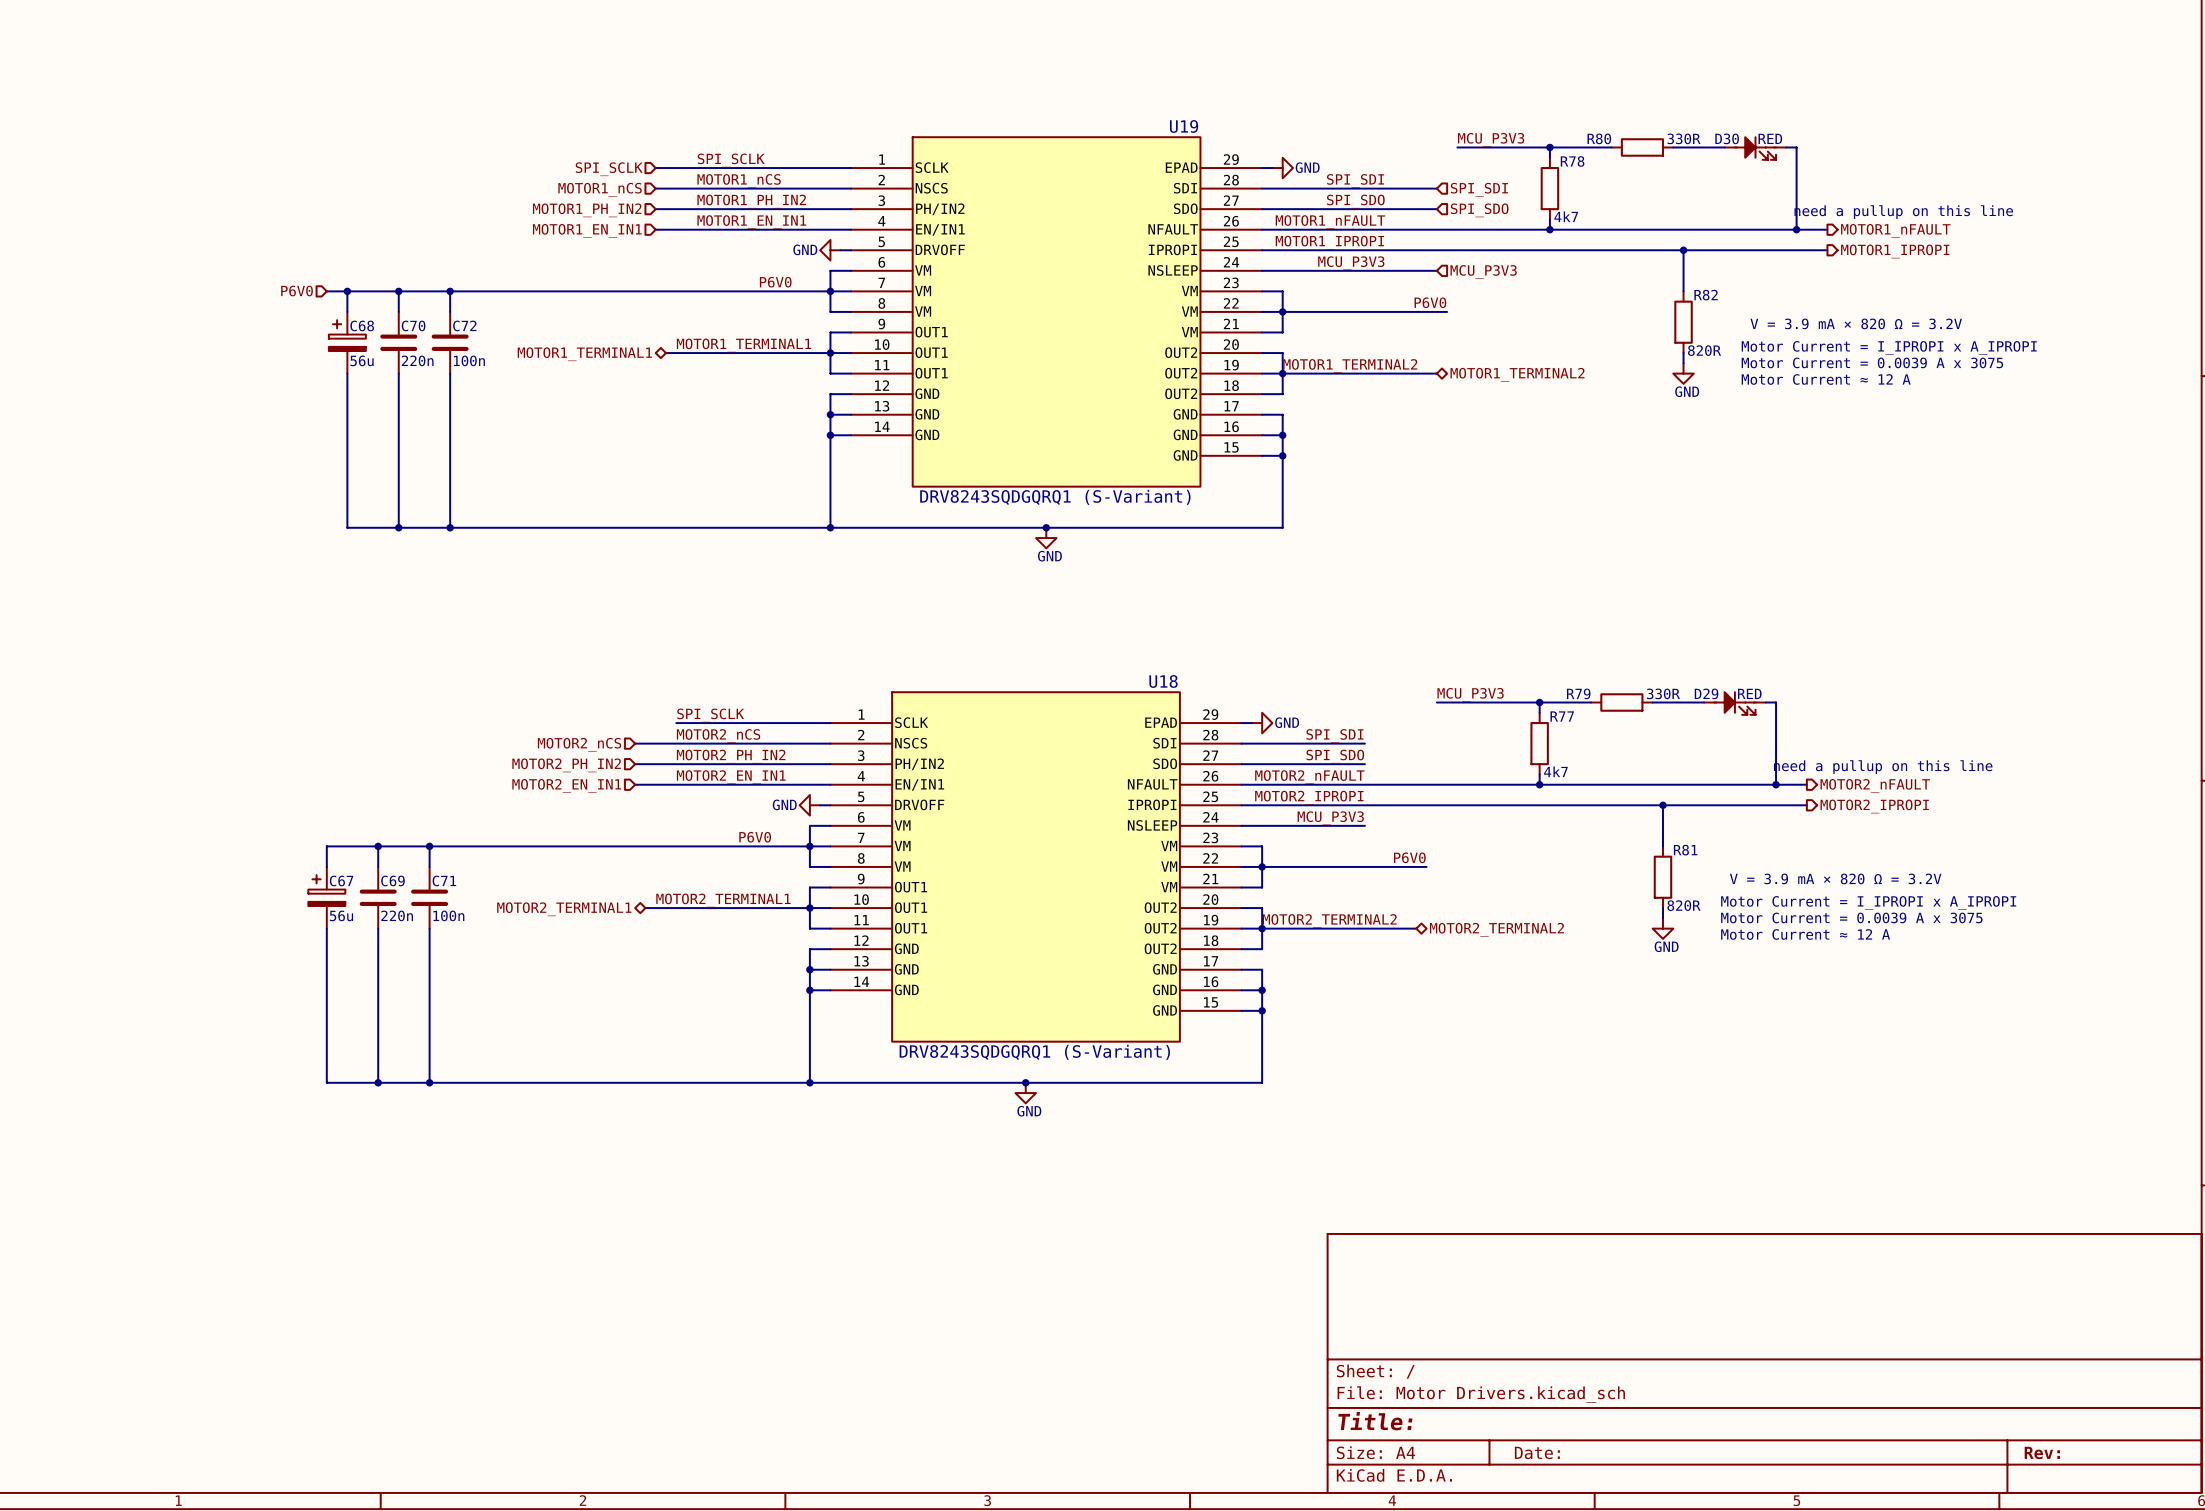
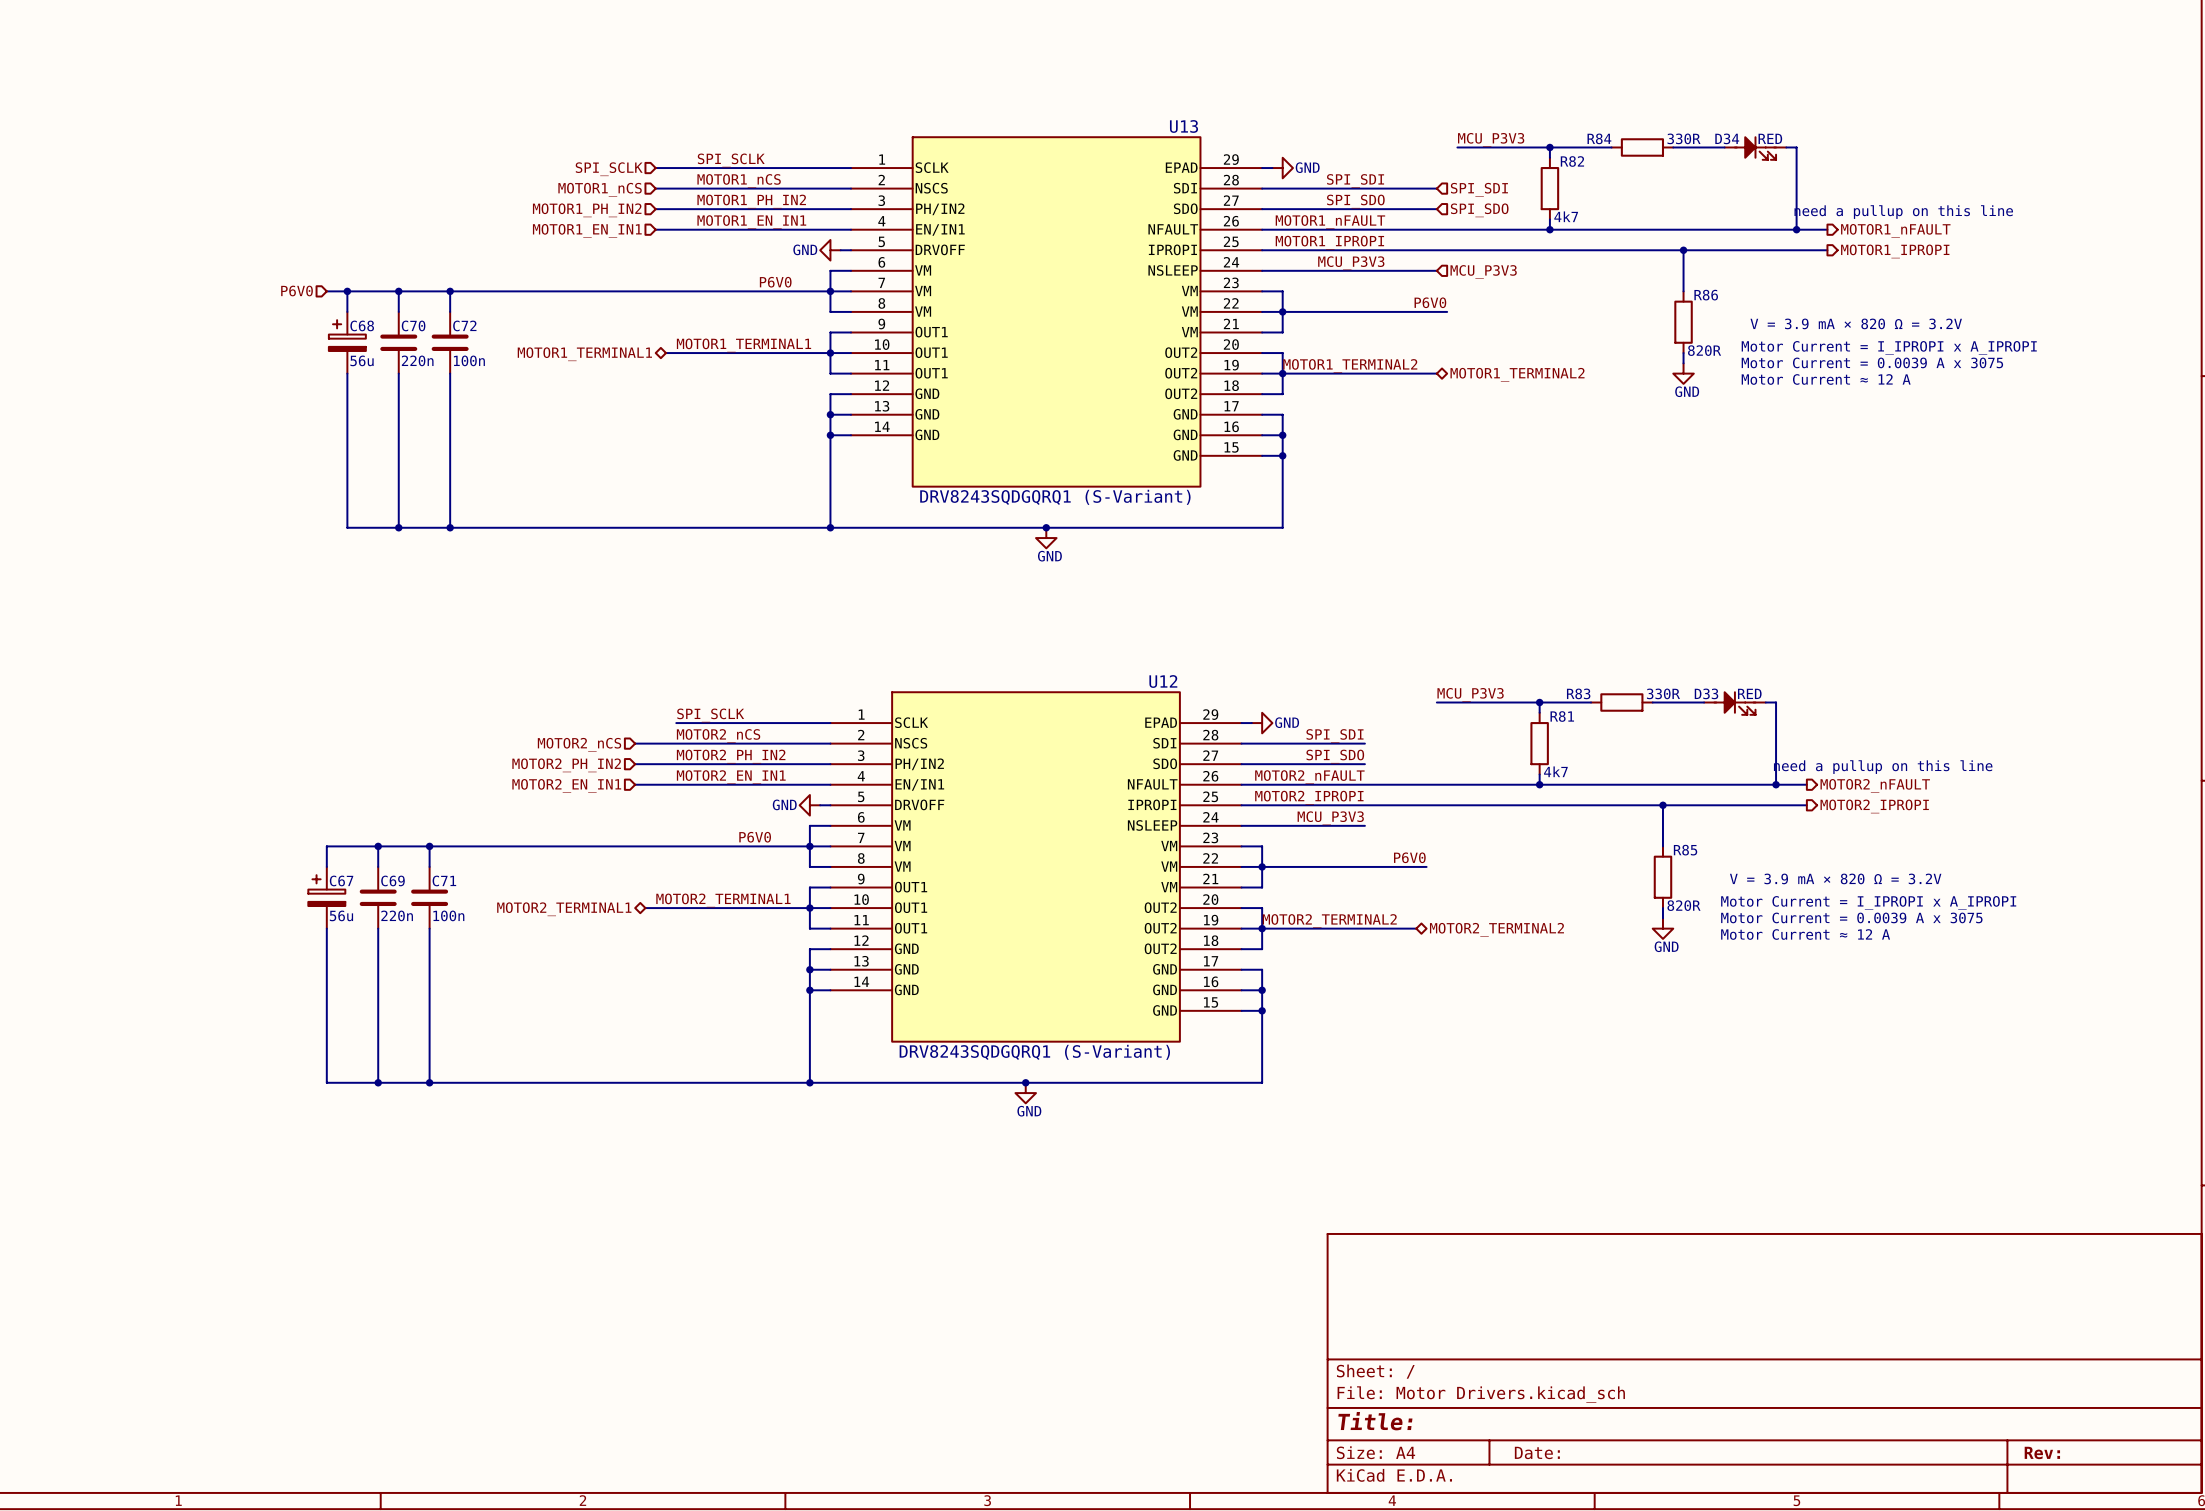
U19 name: U19 (1184, 126) -> U13 (1183, 126)
R80 name: R80 (1599, 138) -> R84 (1599, 138)
D30 name: D30 (1727, 138) -> D34 (1727, 138)
R78 name: R78 (1572, 161) -> R82 (1572, 161)
R82 name: R82 (1706, 295) -> R86 (1706, 295)
U18 name: U18 (1163, 681) -> U12 (1163, 681)
R79 name: R79 (1578, 693) -> R83 (1578, 693)
D29 name: D29 (1706, 693) -> D33 (1706, 693)
R77 name: R77 (1562, 716) -> R81 (1562, 716)
R81 name: R81 (1685, 850) -> R85 (1685, 850)

